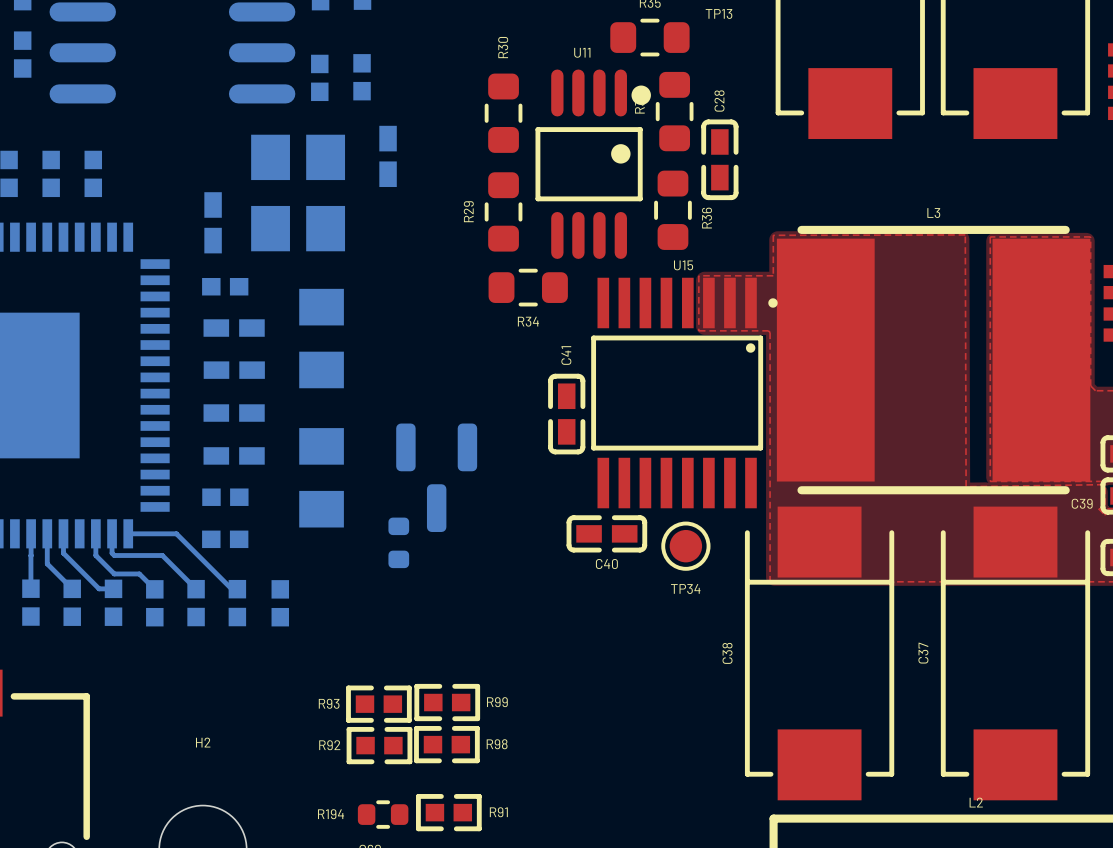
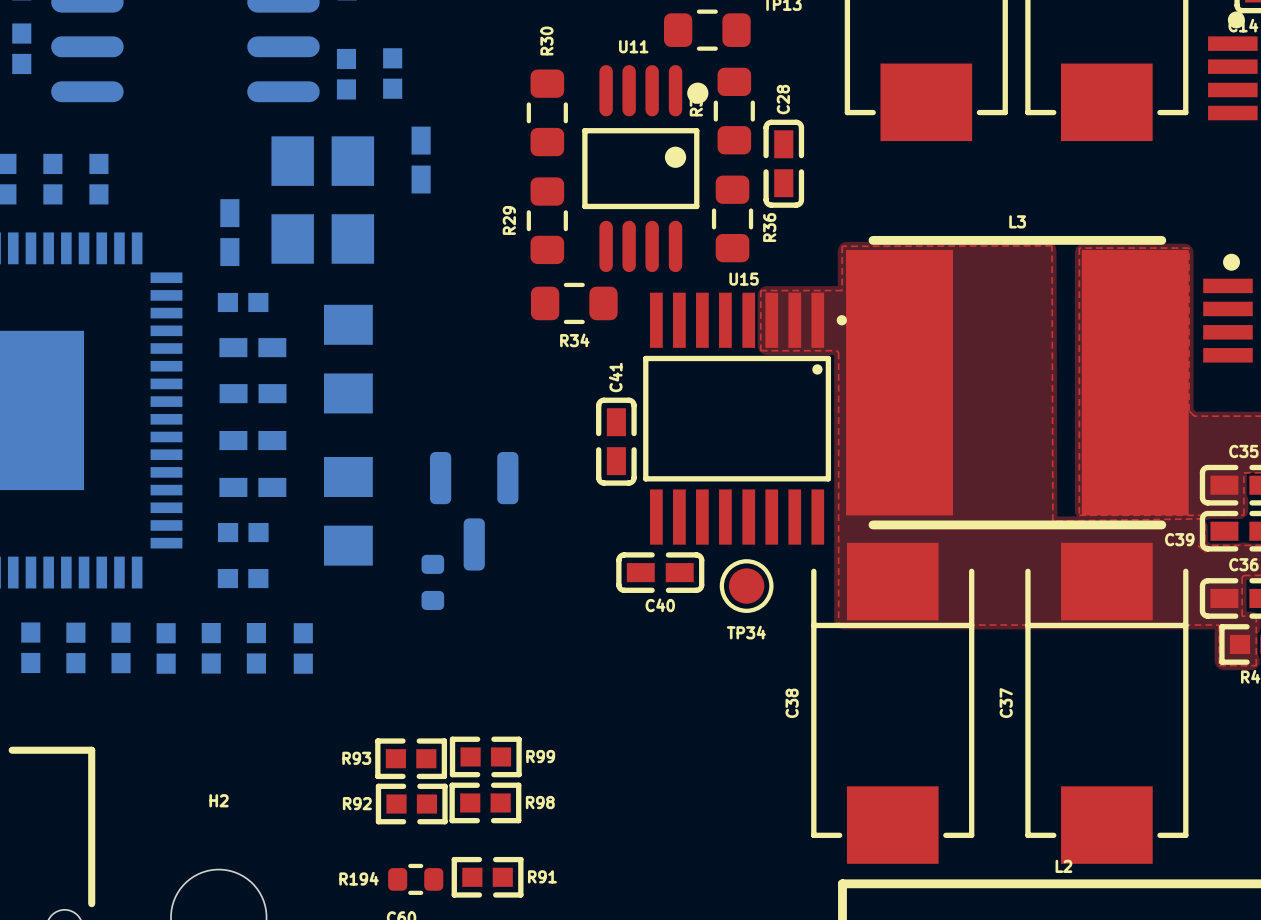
bottom track: (47, 533) (47, 563) (72, 588) -> none
bottom track: (63, 533) (63, 553) (99, 588) (113, 588) -> none
bottom track: (95, 533) (95, 555) (114, 573) (139, 573) (154, 589) -> none
bottom track: (112, 533) (112, 553) (114, 555) (162, 555) (196, 589) -> none
bottom track: (128, 533) (176, 533) (231, 589) (237, 589) -> none

